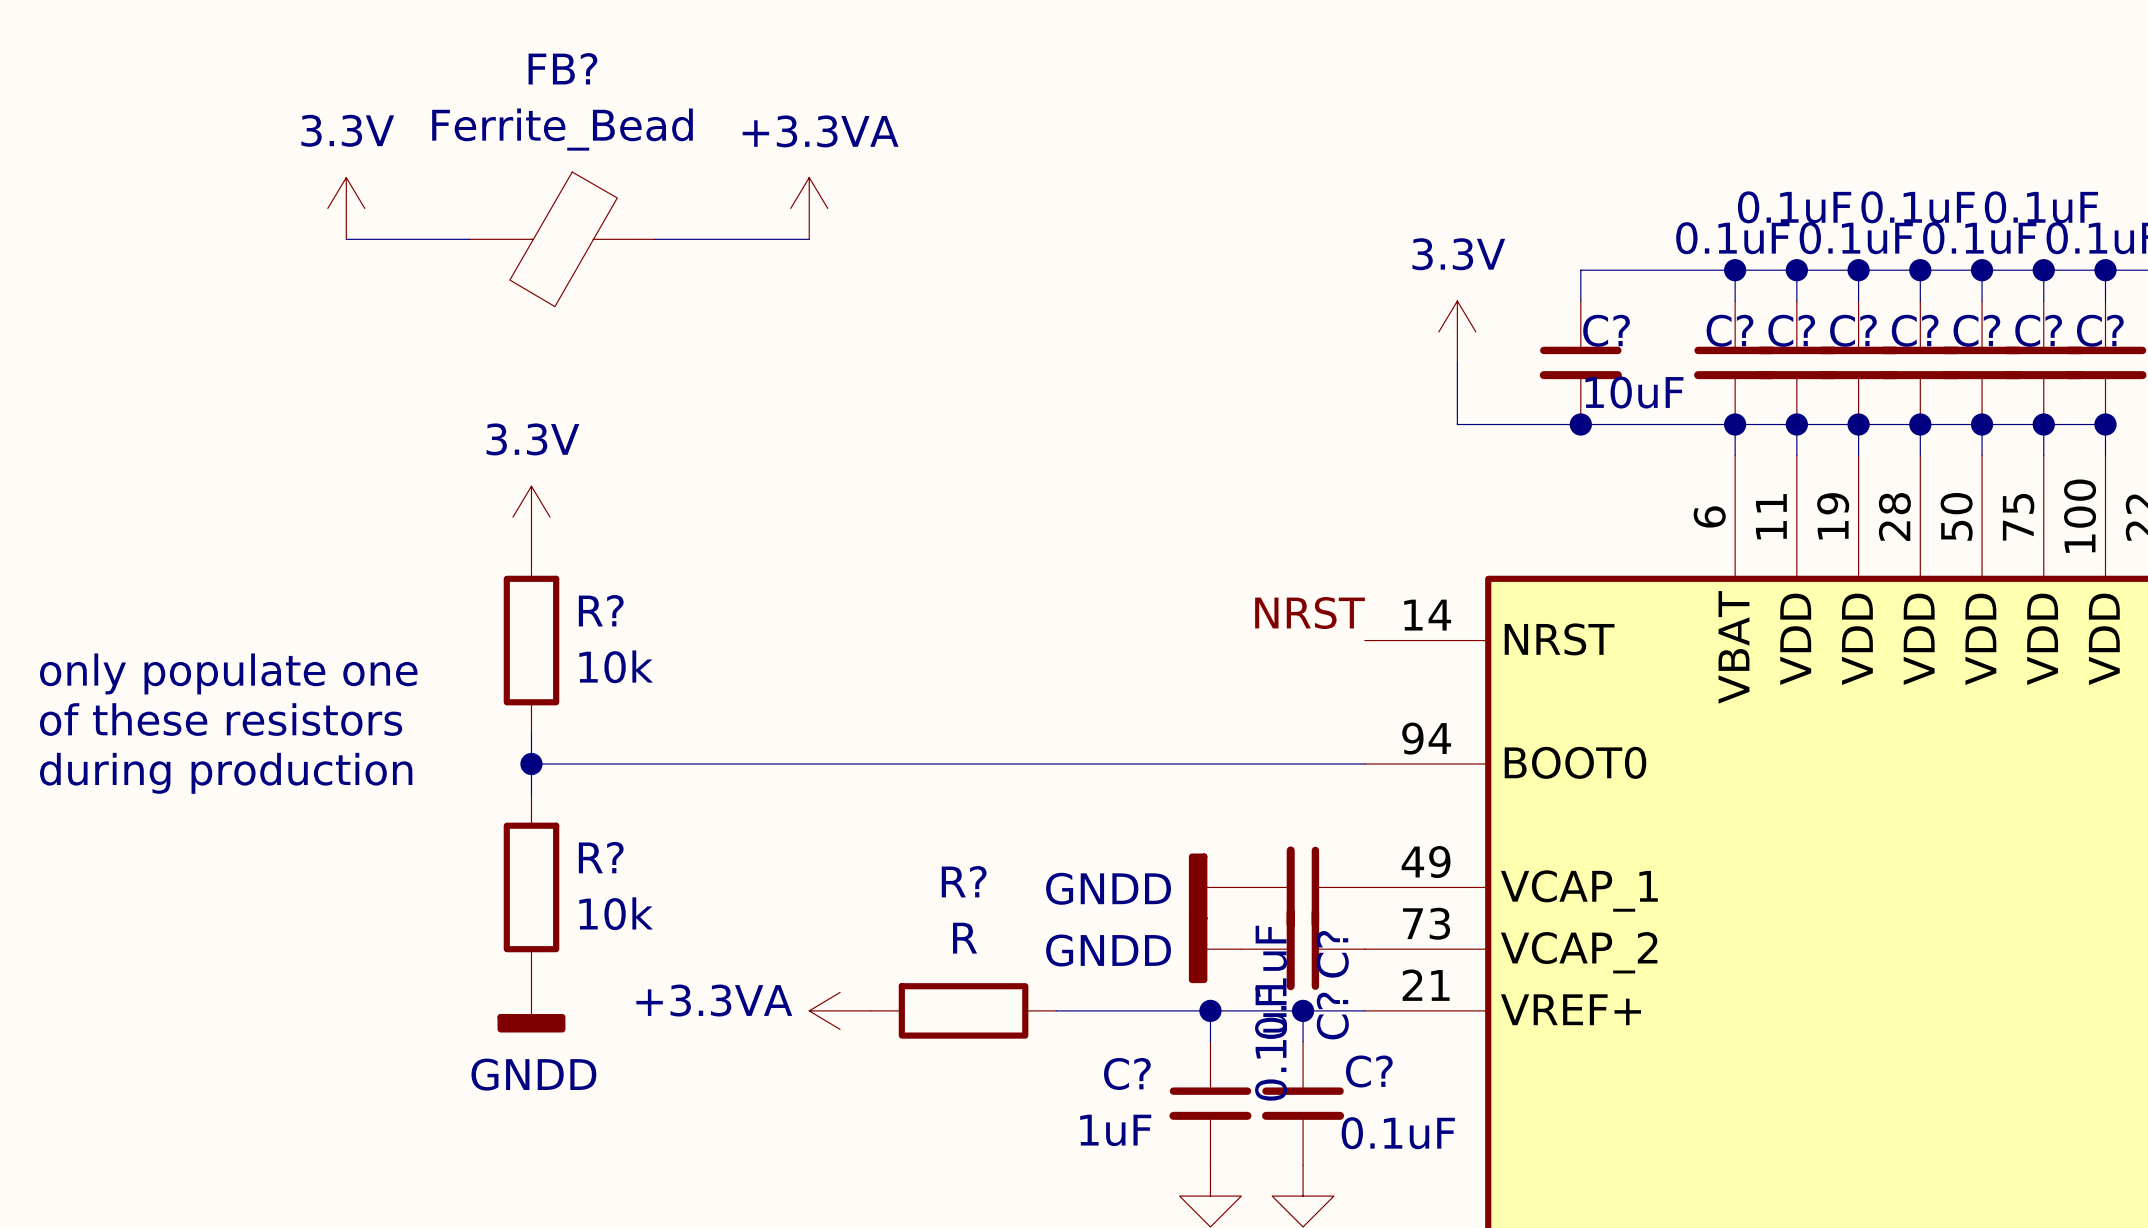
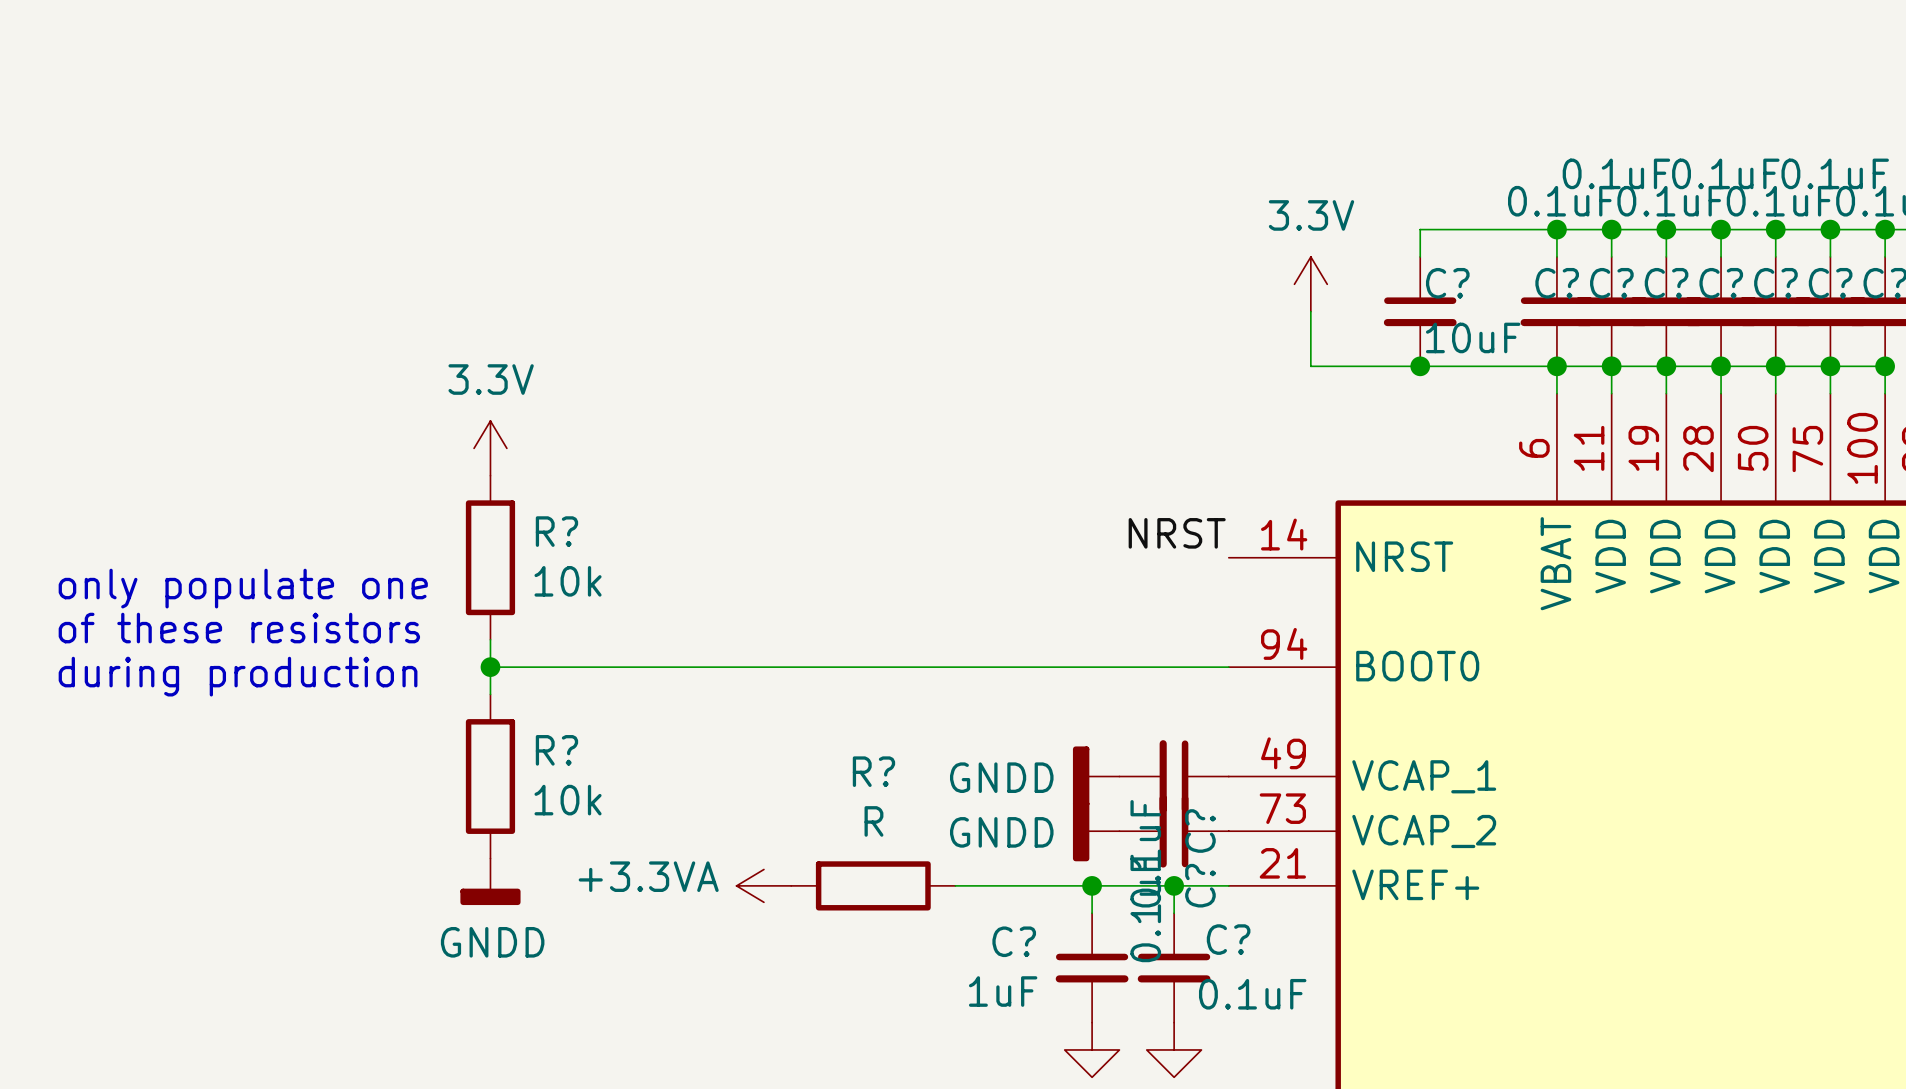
power symbol: 3.3V (346, 208) -> none
power symbol: +3.3VA (809, 208) -> none
wire: (346, 239) (469, 239) -> none
FB?: Ferrite_Bead (562, 239) -> none
wire: (654, 239) (809, 239) -> none

